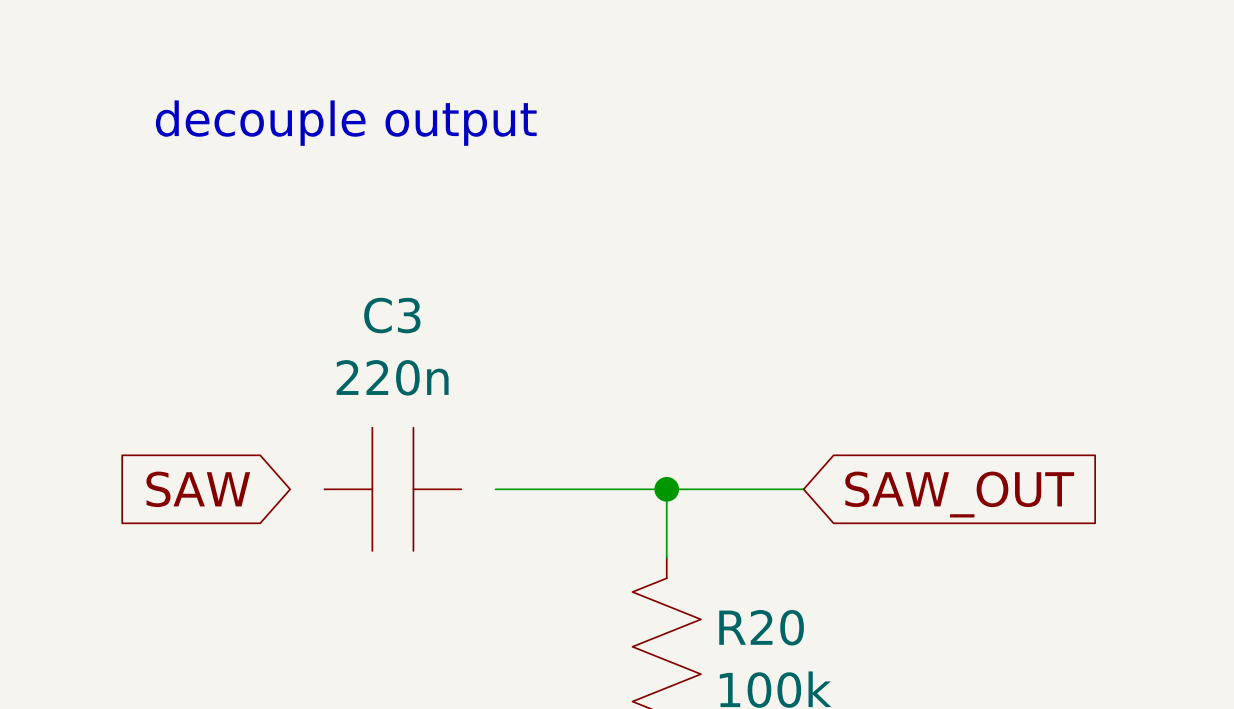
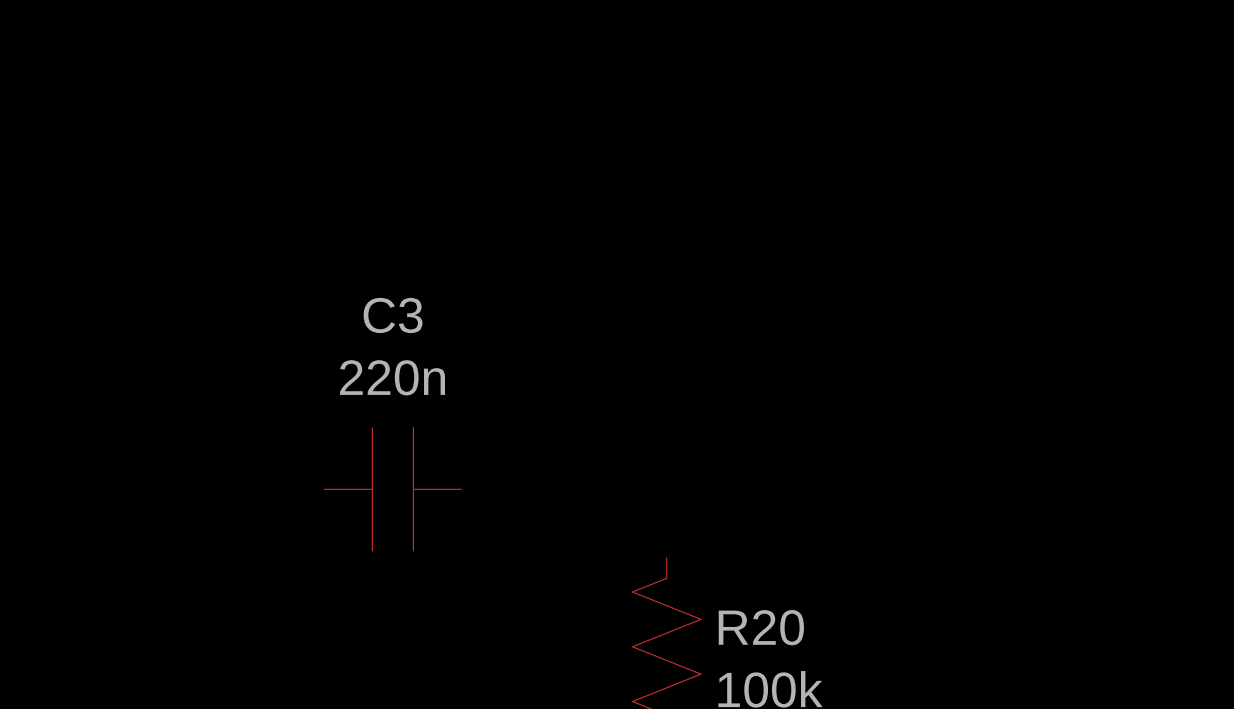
text: decouple output (346, 123) -> none
global label: SAW (198, 489) -> none
wire: (495, 489) (803, 489) -> none
wire: (666, 489) (666, 557) -> none
junction: (666, 489) -> none
global label: SAW_OUT (959, 494) -> none

